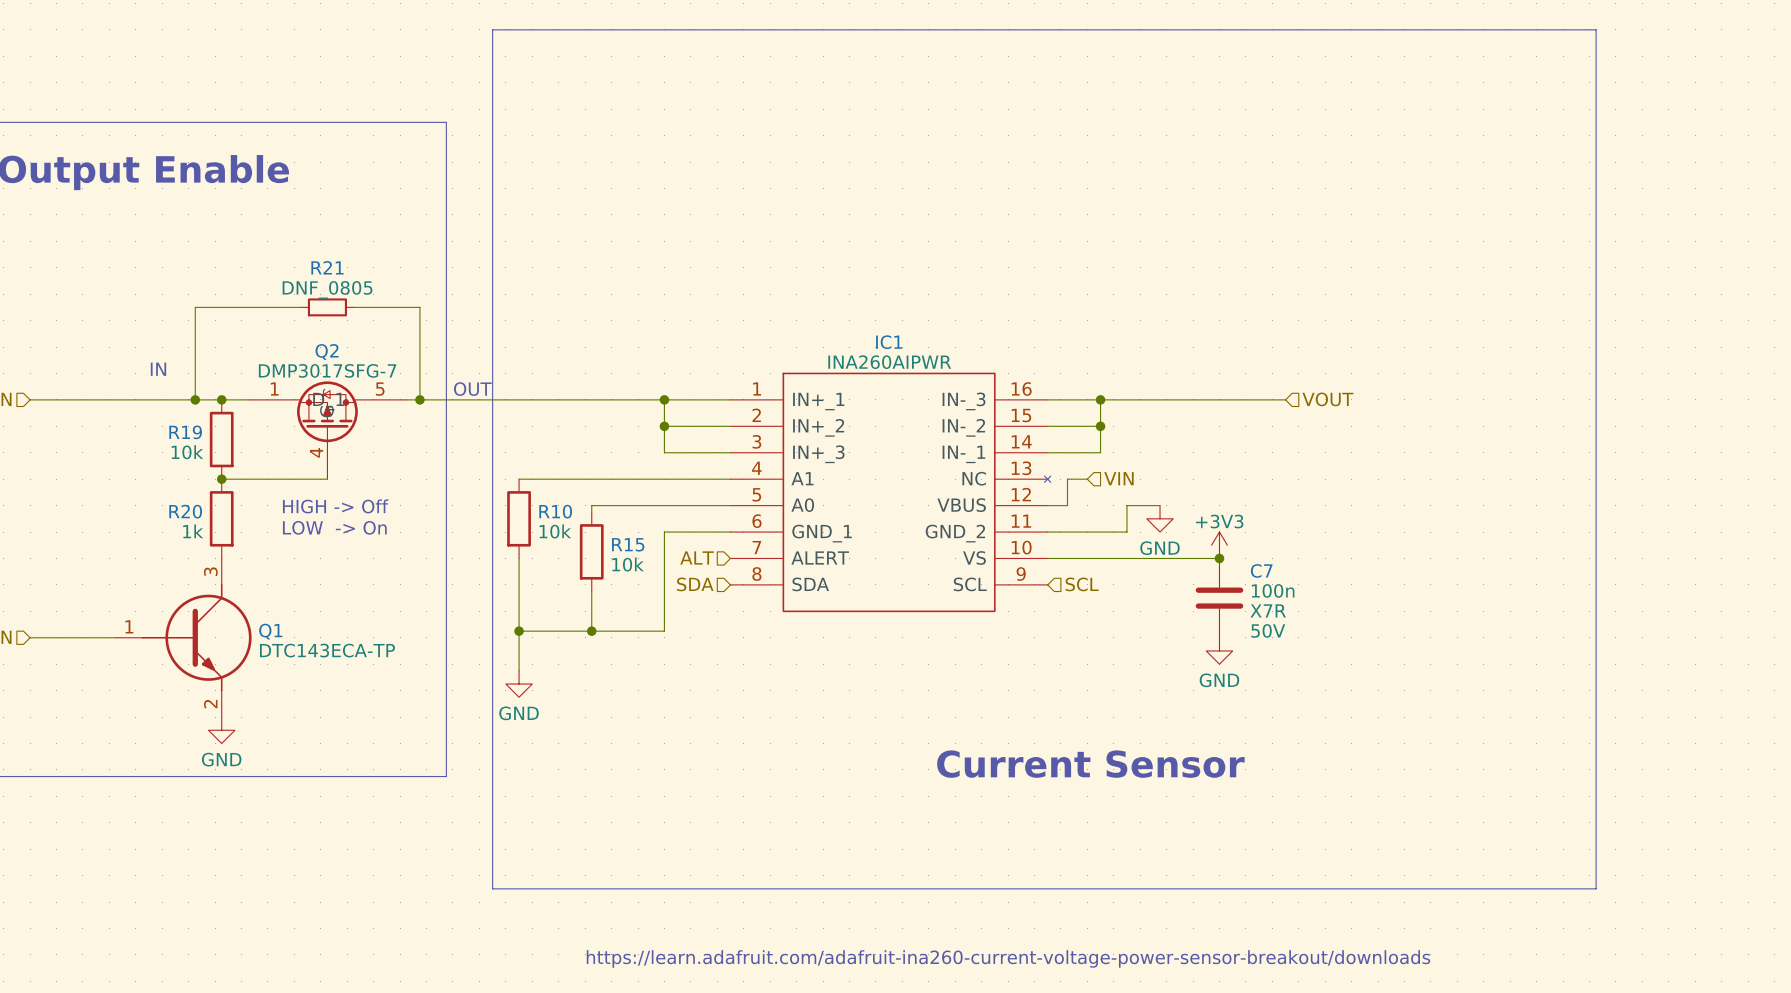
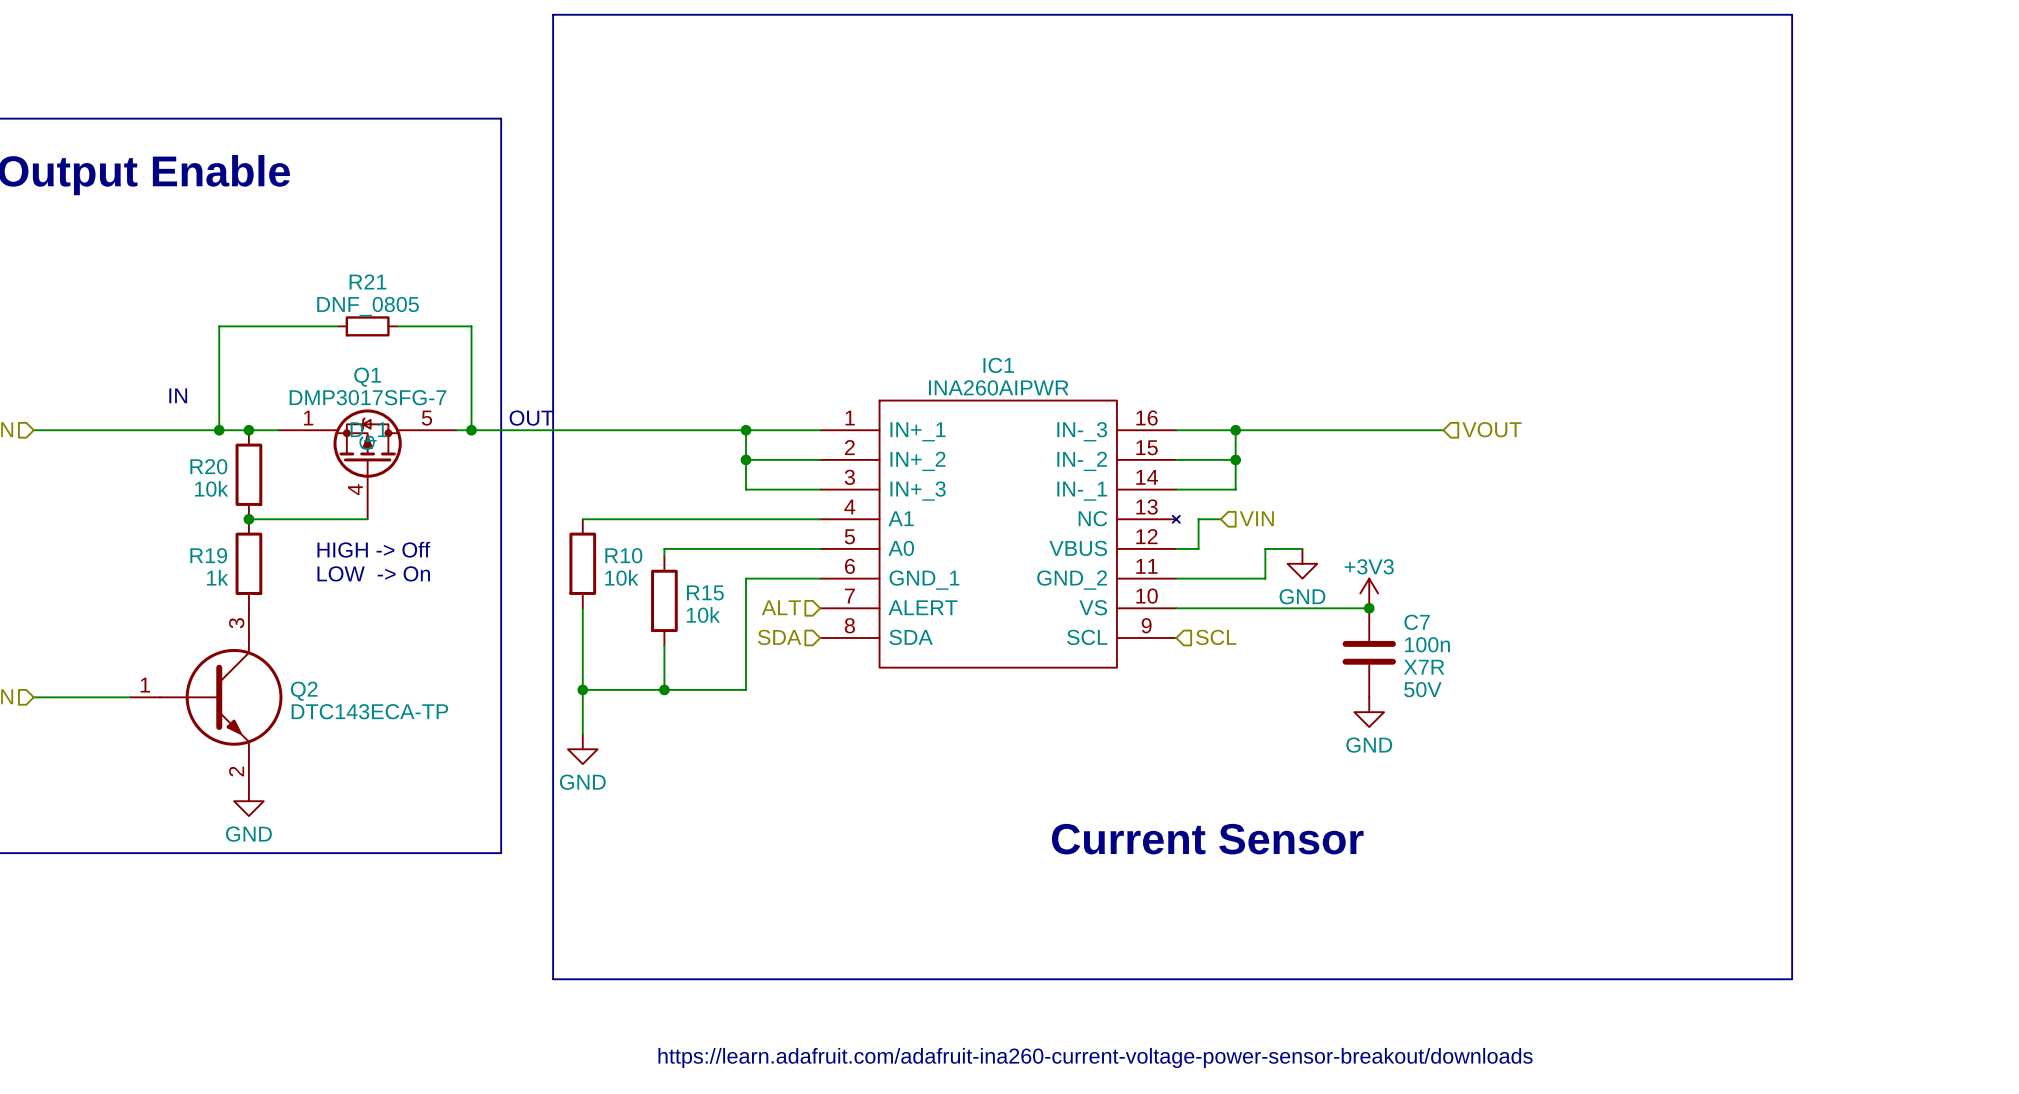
Q2 name: Q2 (327, 351) -> Q1 (367, 377)
R19 name: R19 (185, 432) -> R20 (208, 466)
R20 name: R20 (185, 511) -> R19 (208, 555)
Q1 name: Q1 (270, 631) -> Q2 (304, 691)

